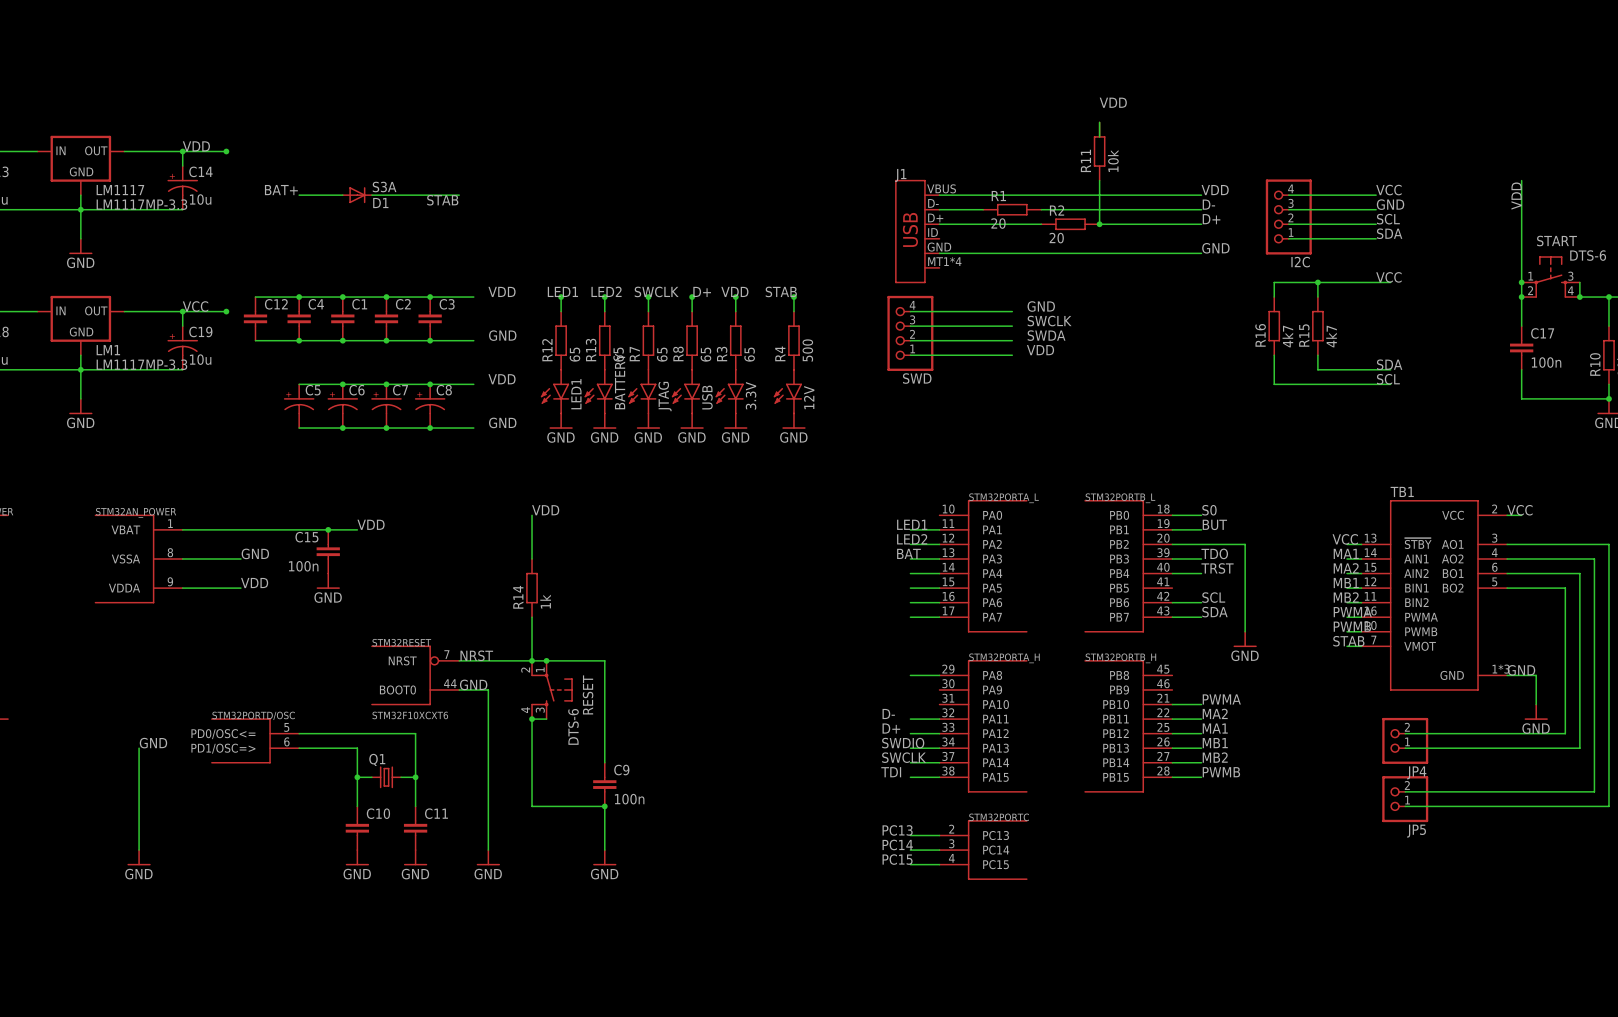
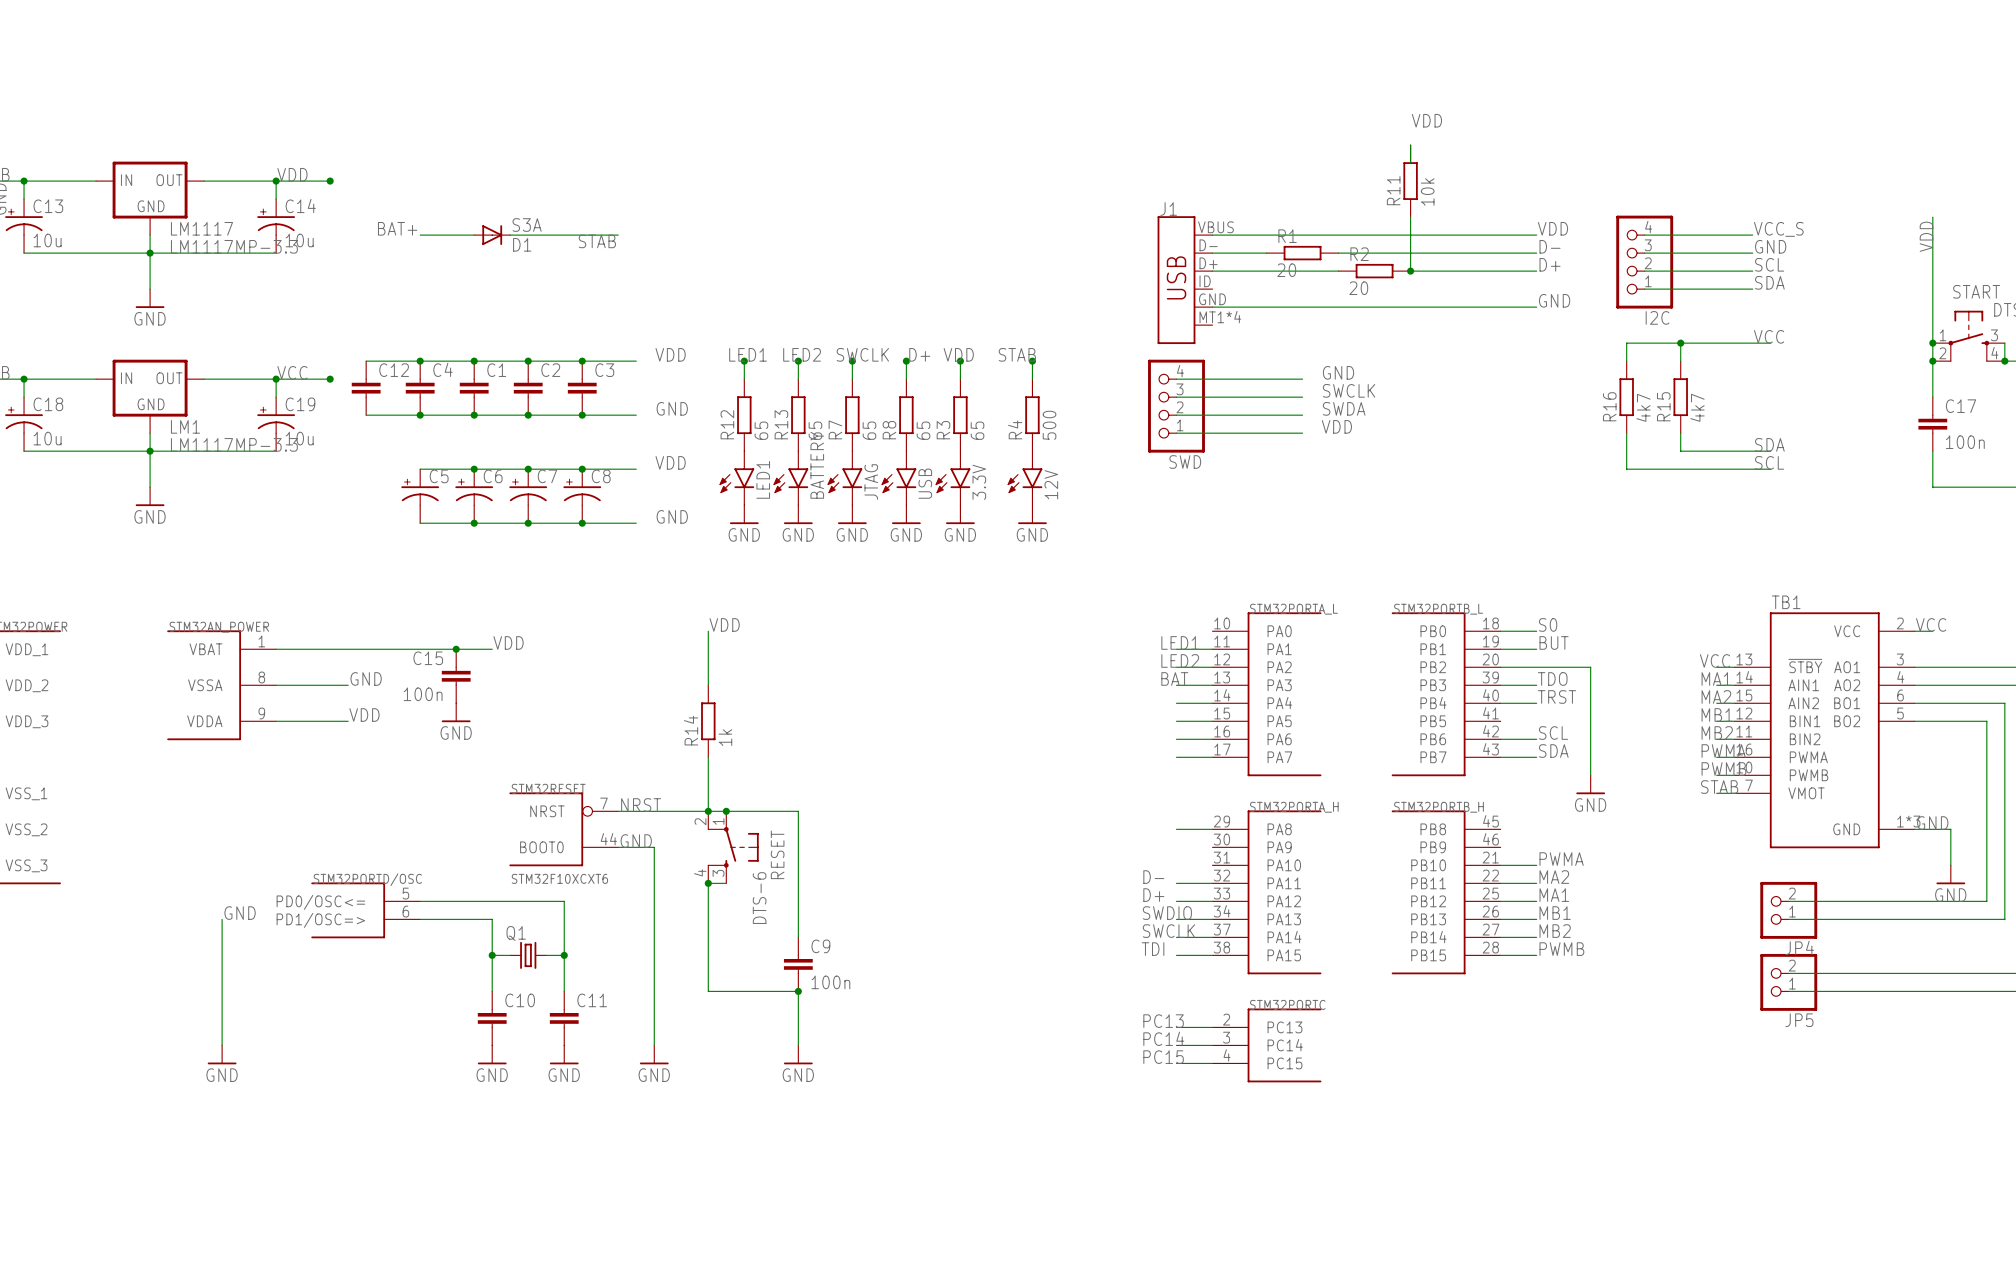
label: VCC (1388, 190) -> VCC_S (1778, 229)

